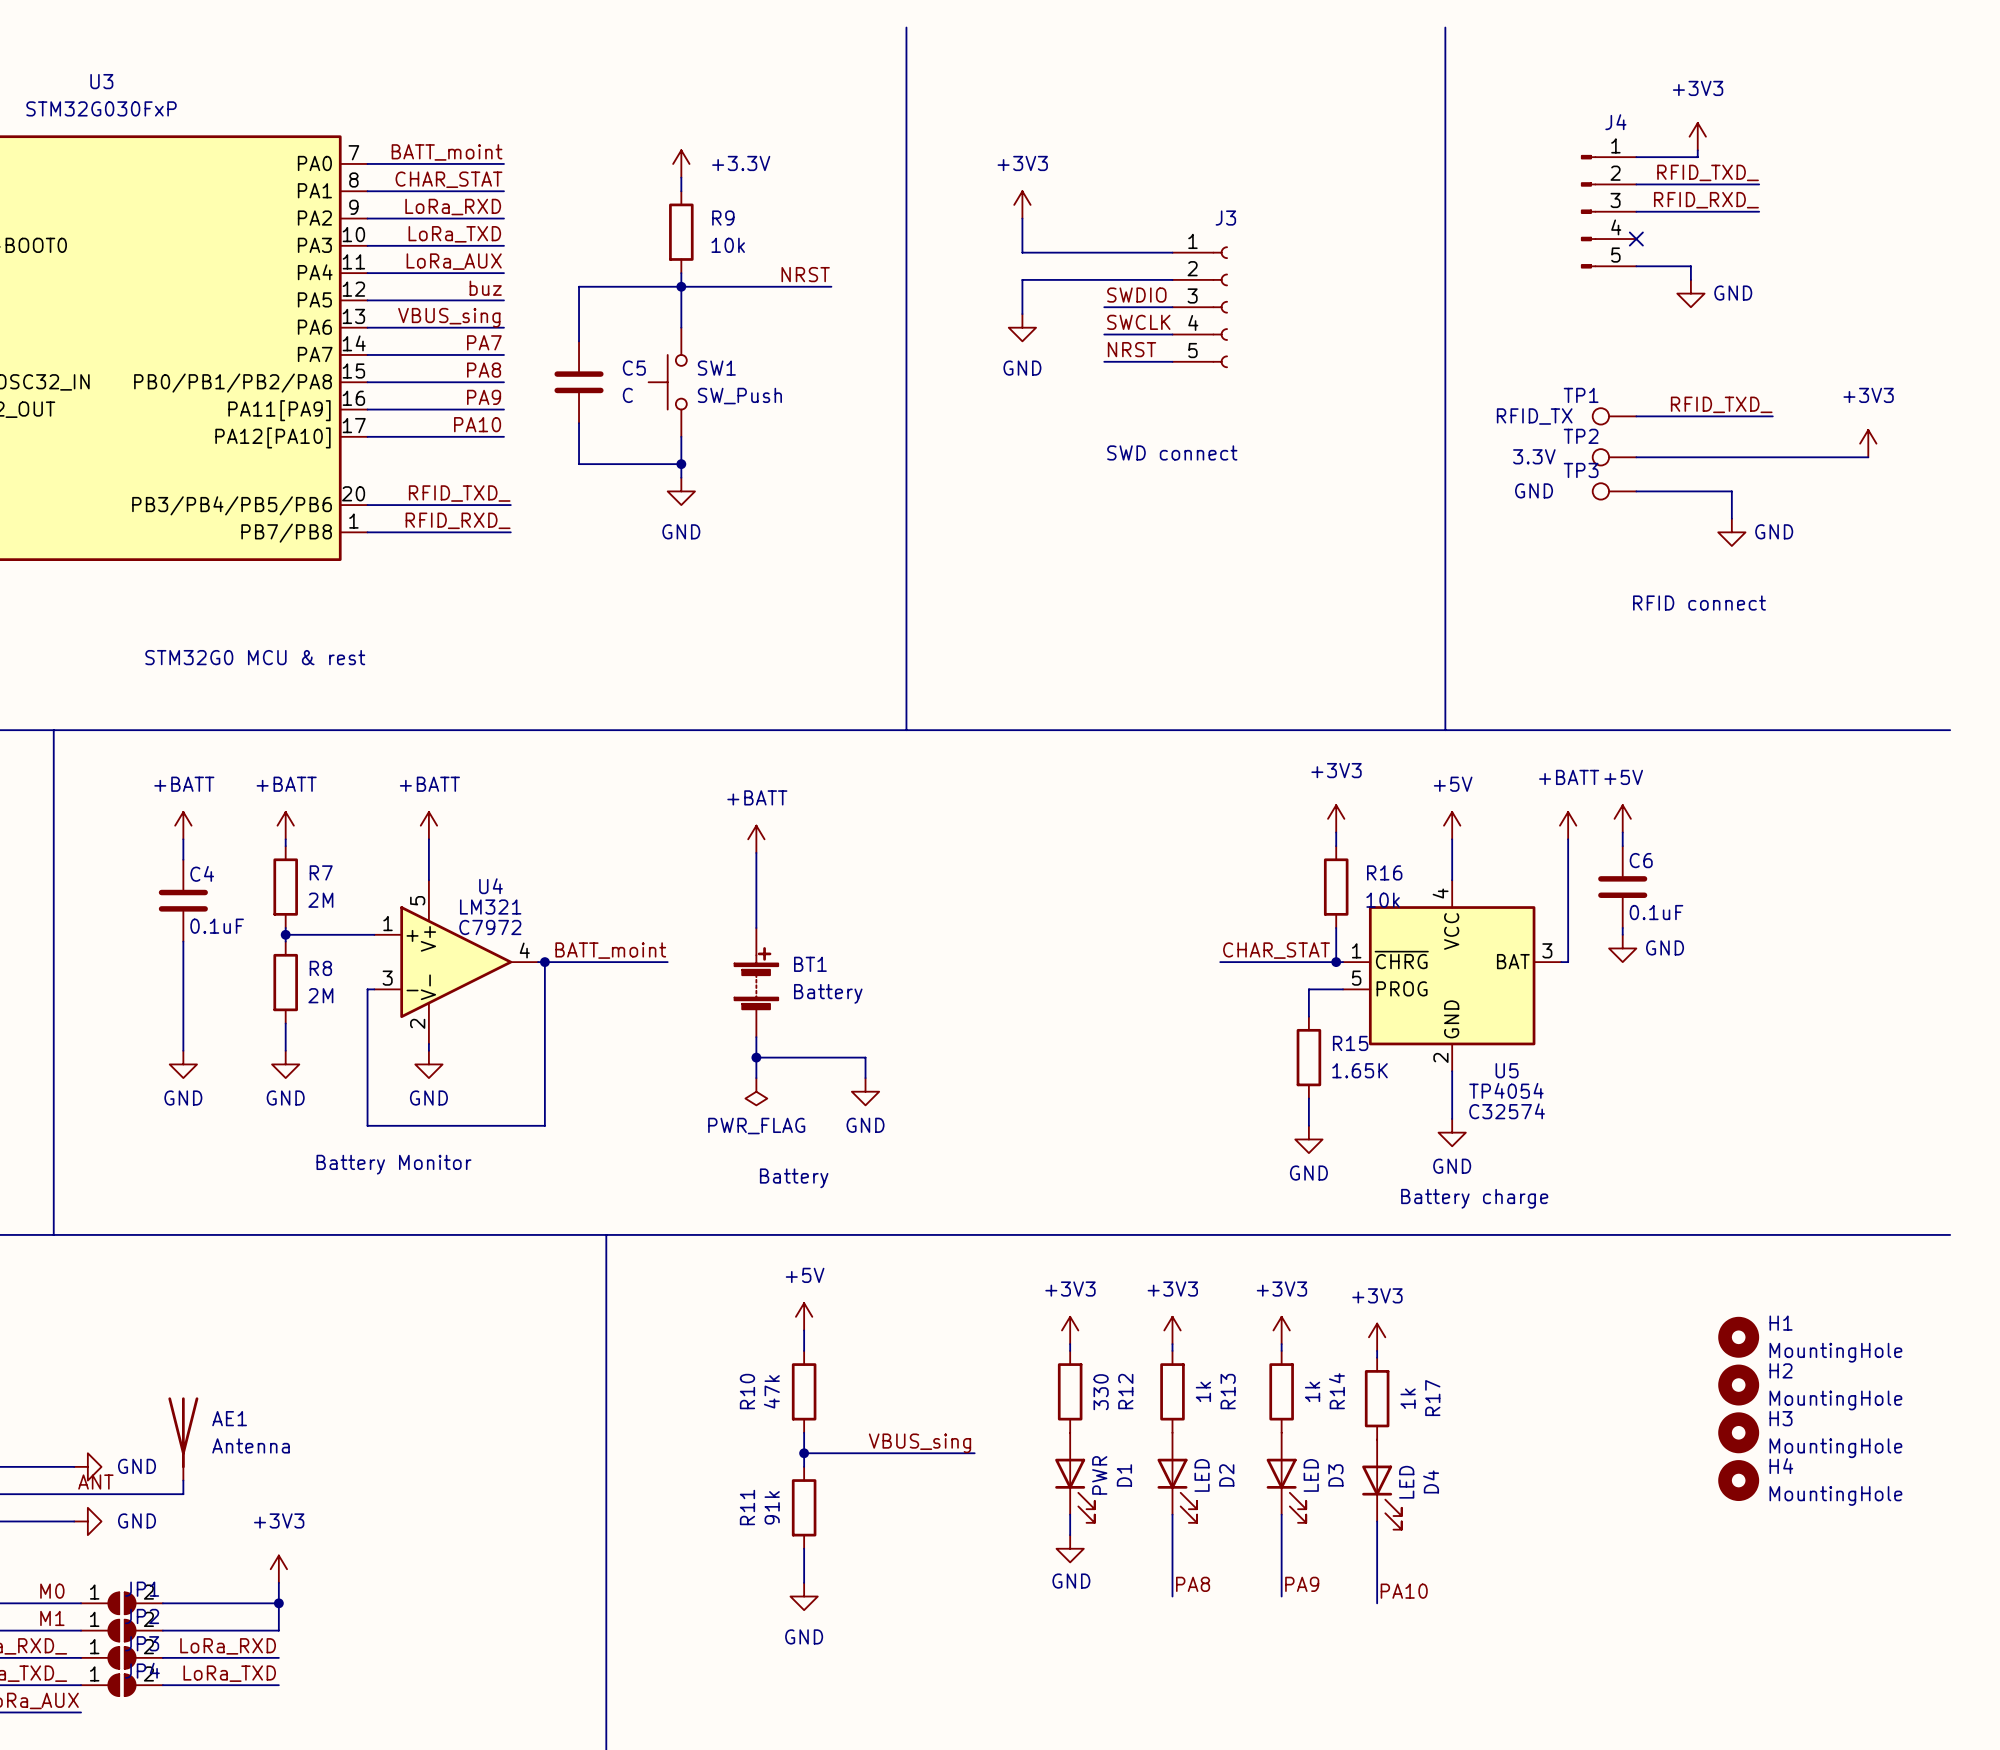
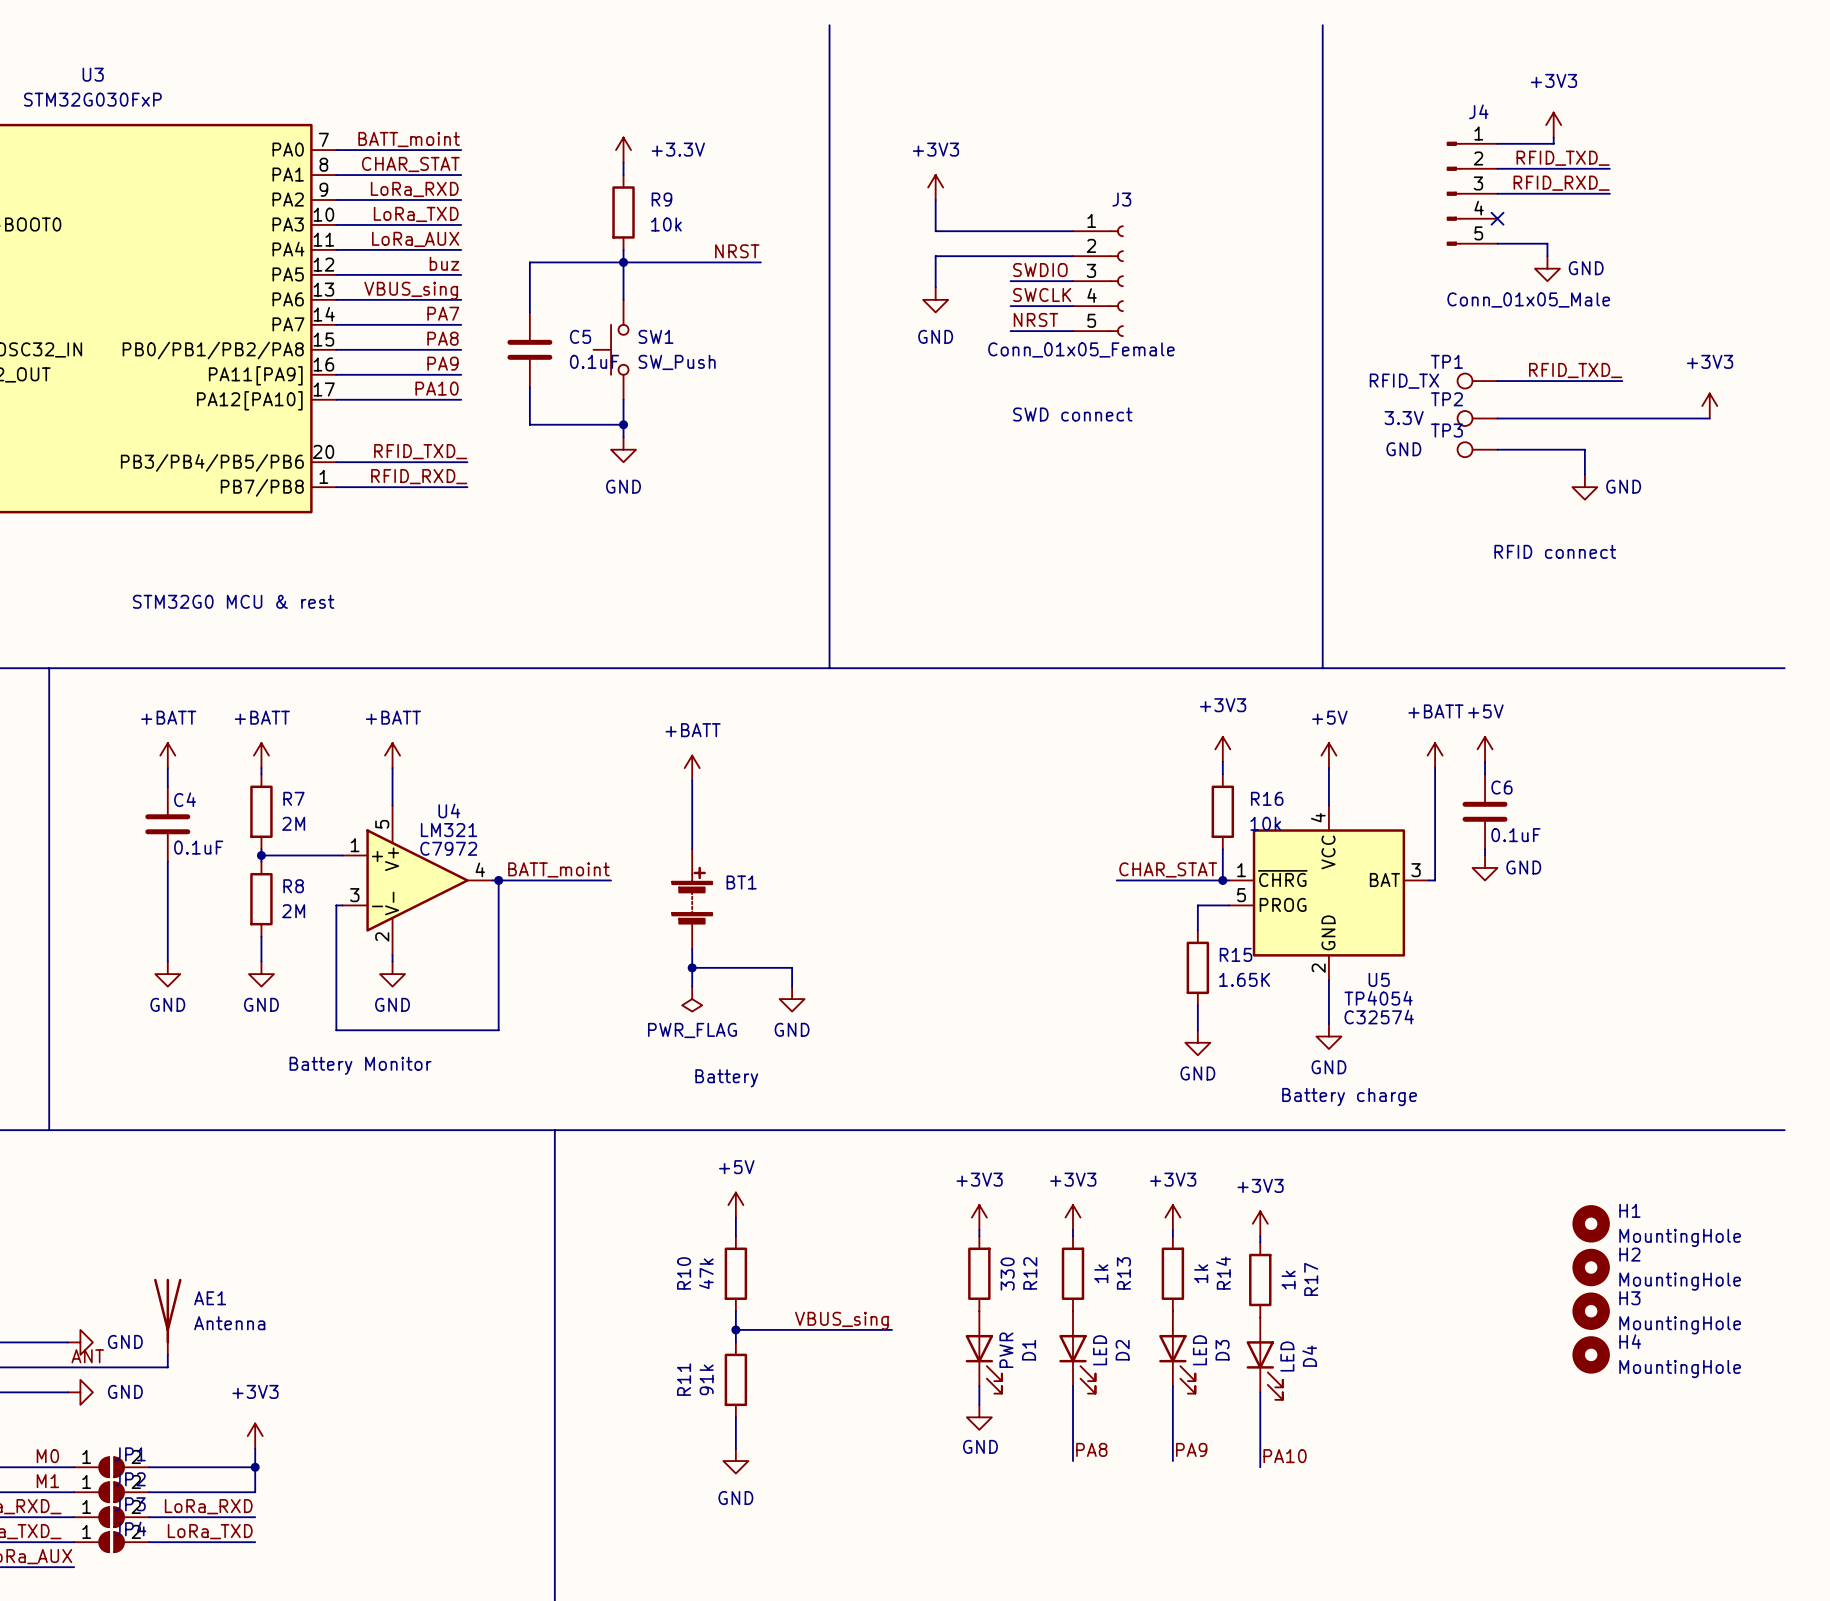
J4 value: none -> Conn_01x05_Male (1528, 300)
J3 value: none -> Conn_01x05_Female (1081, 349)
C5 value: C (627, 395) -> 0.1uF (594, 361)
BT1 value: Battery (828, 993) -> none

